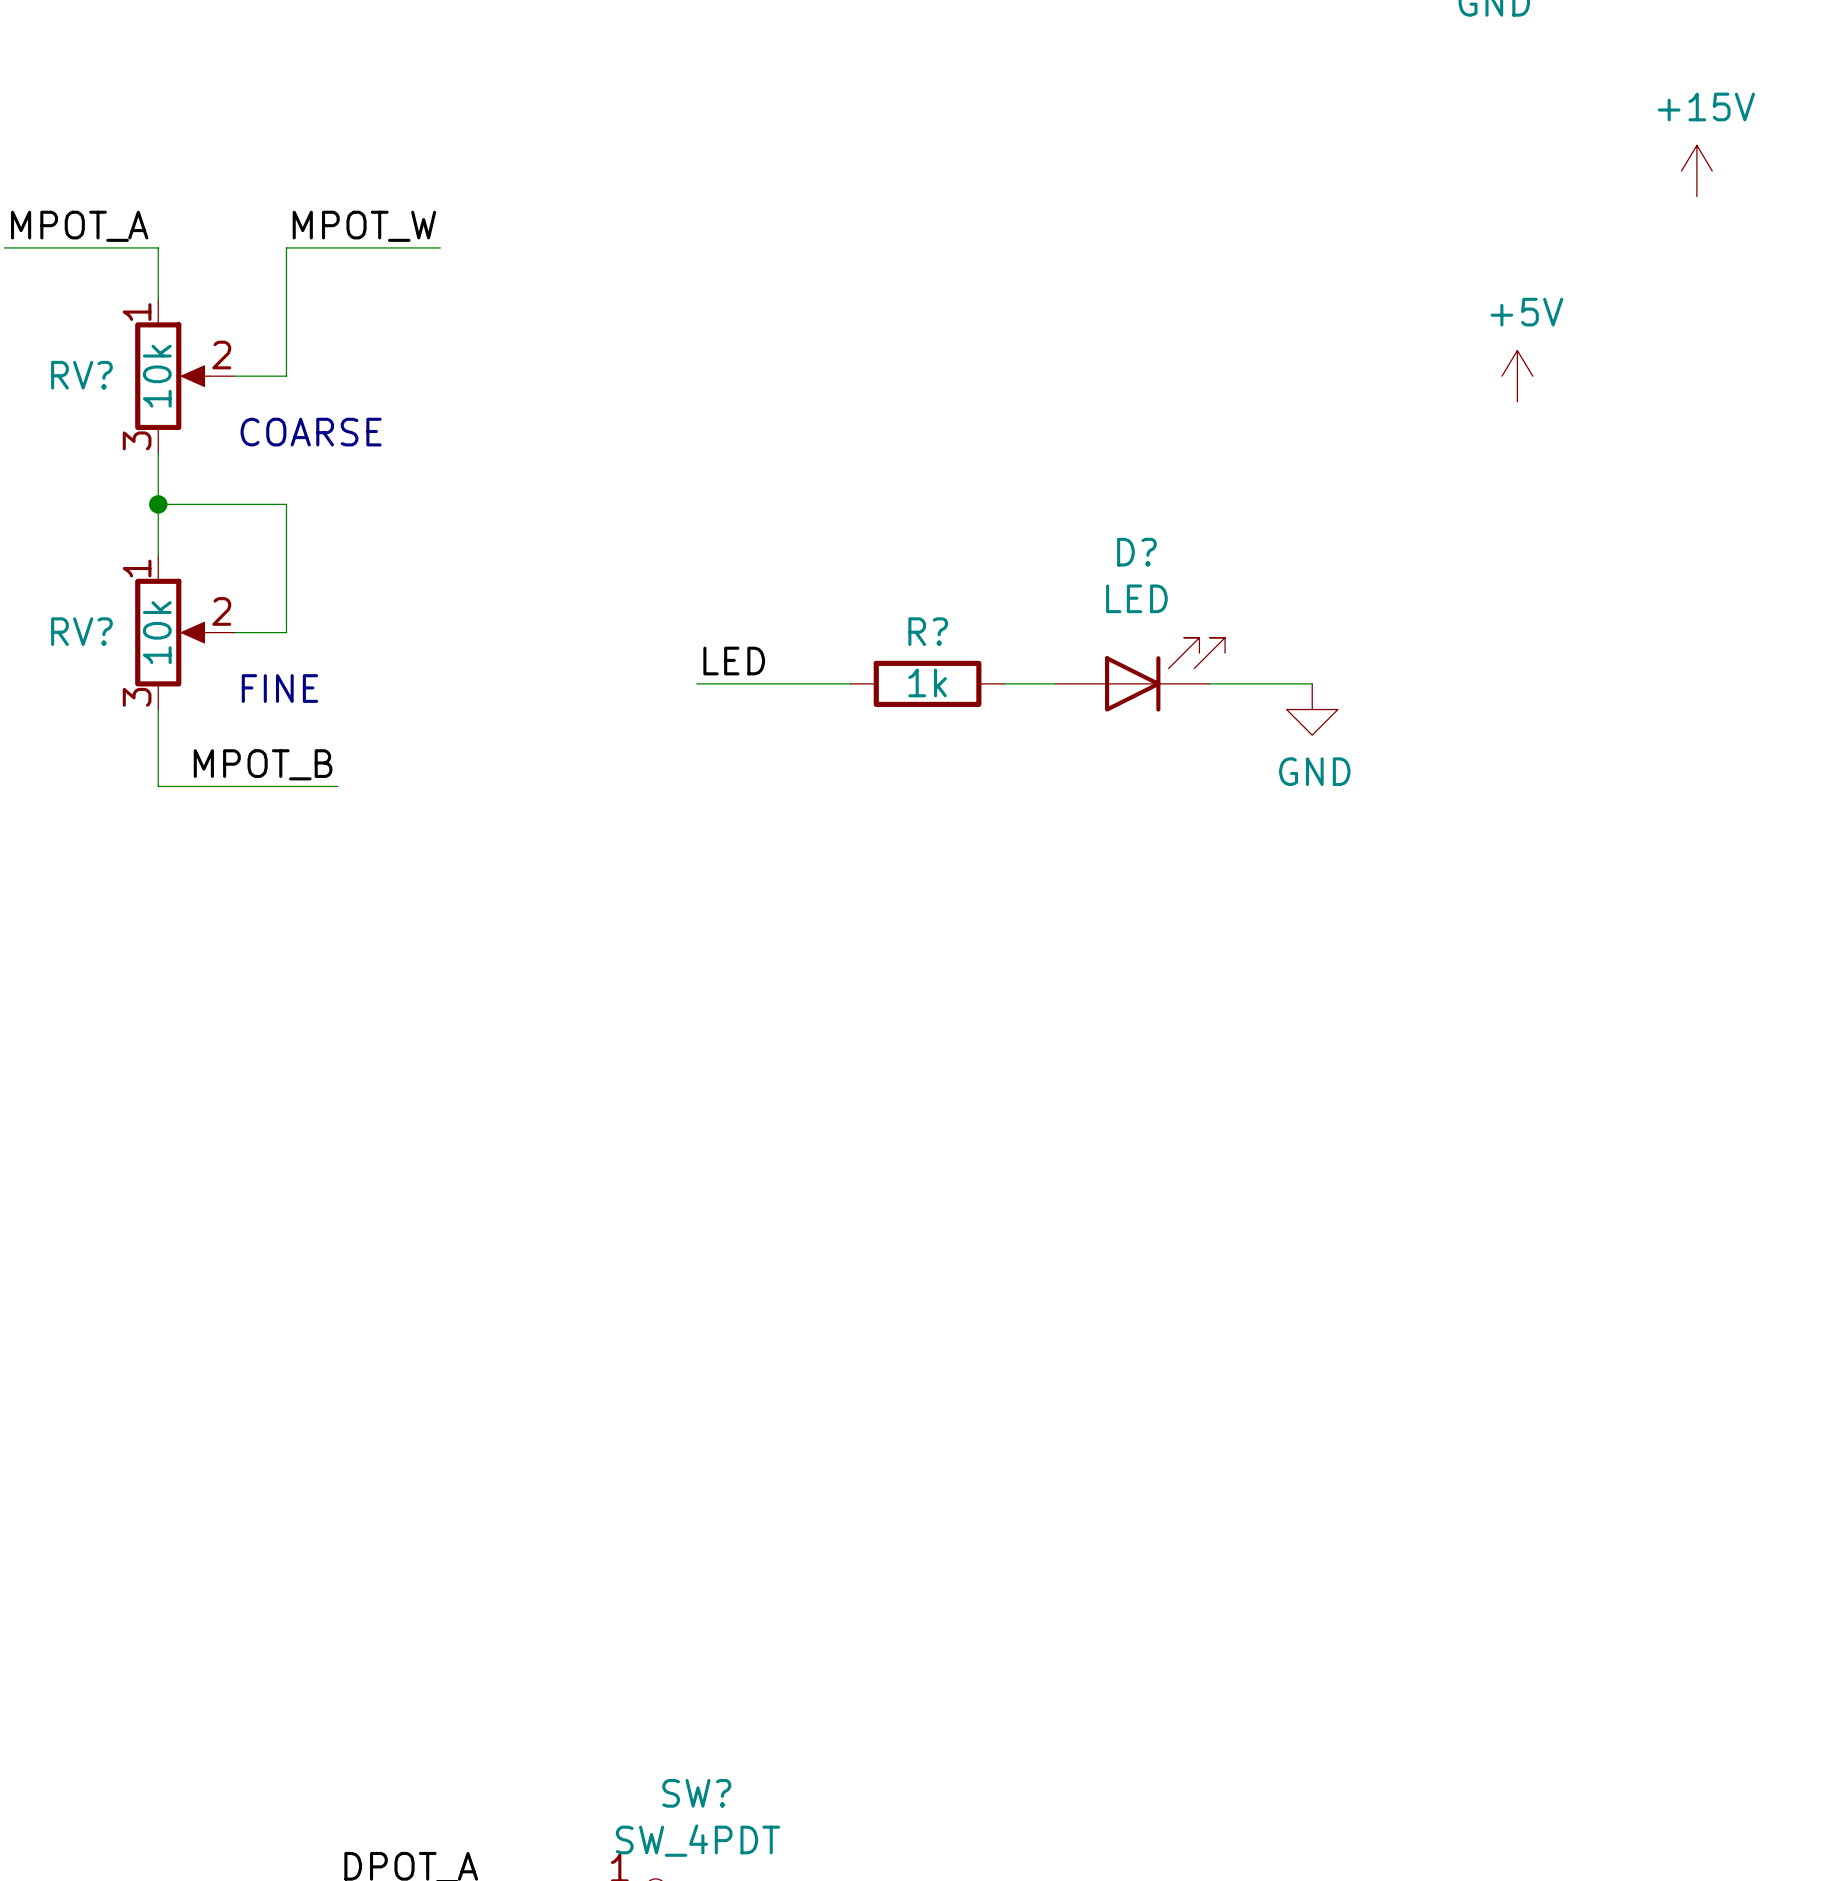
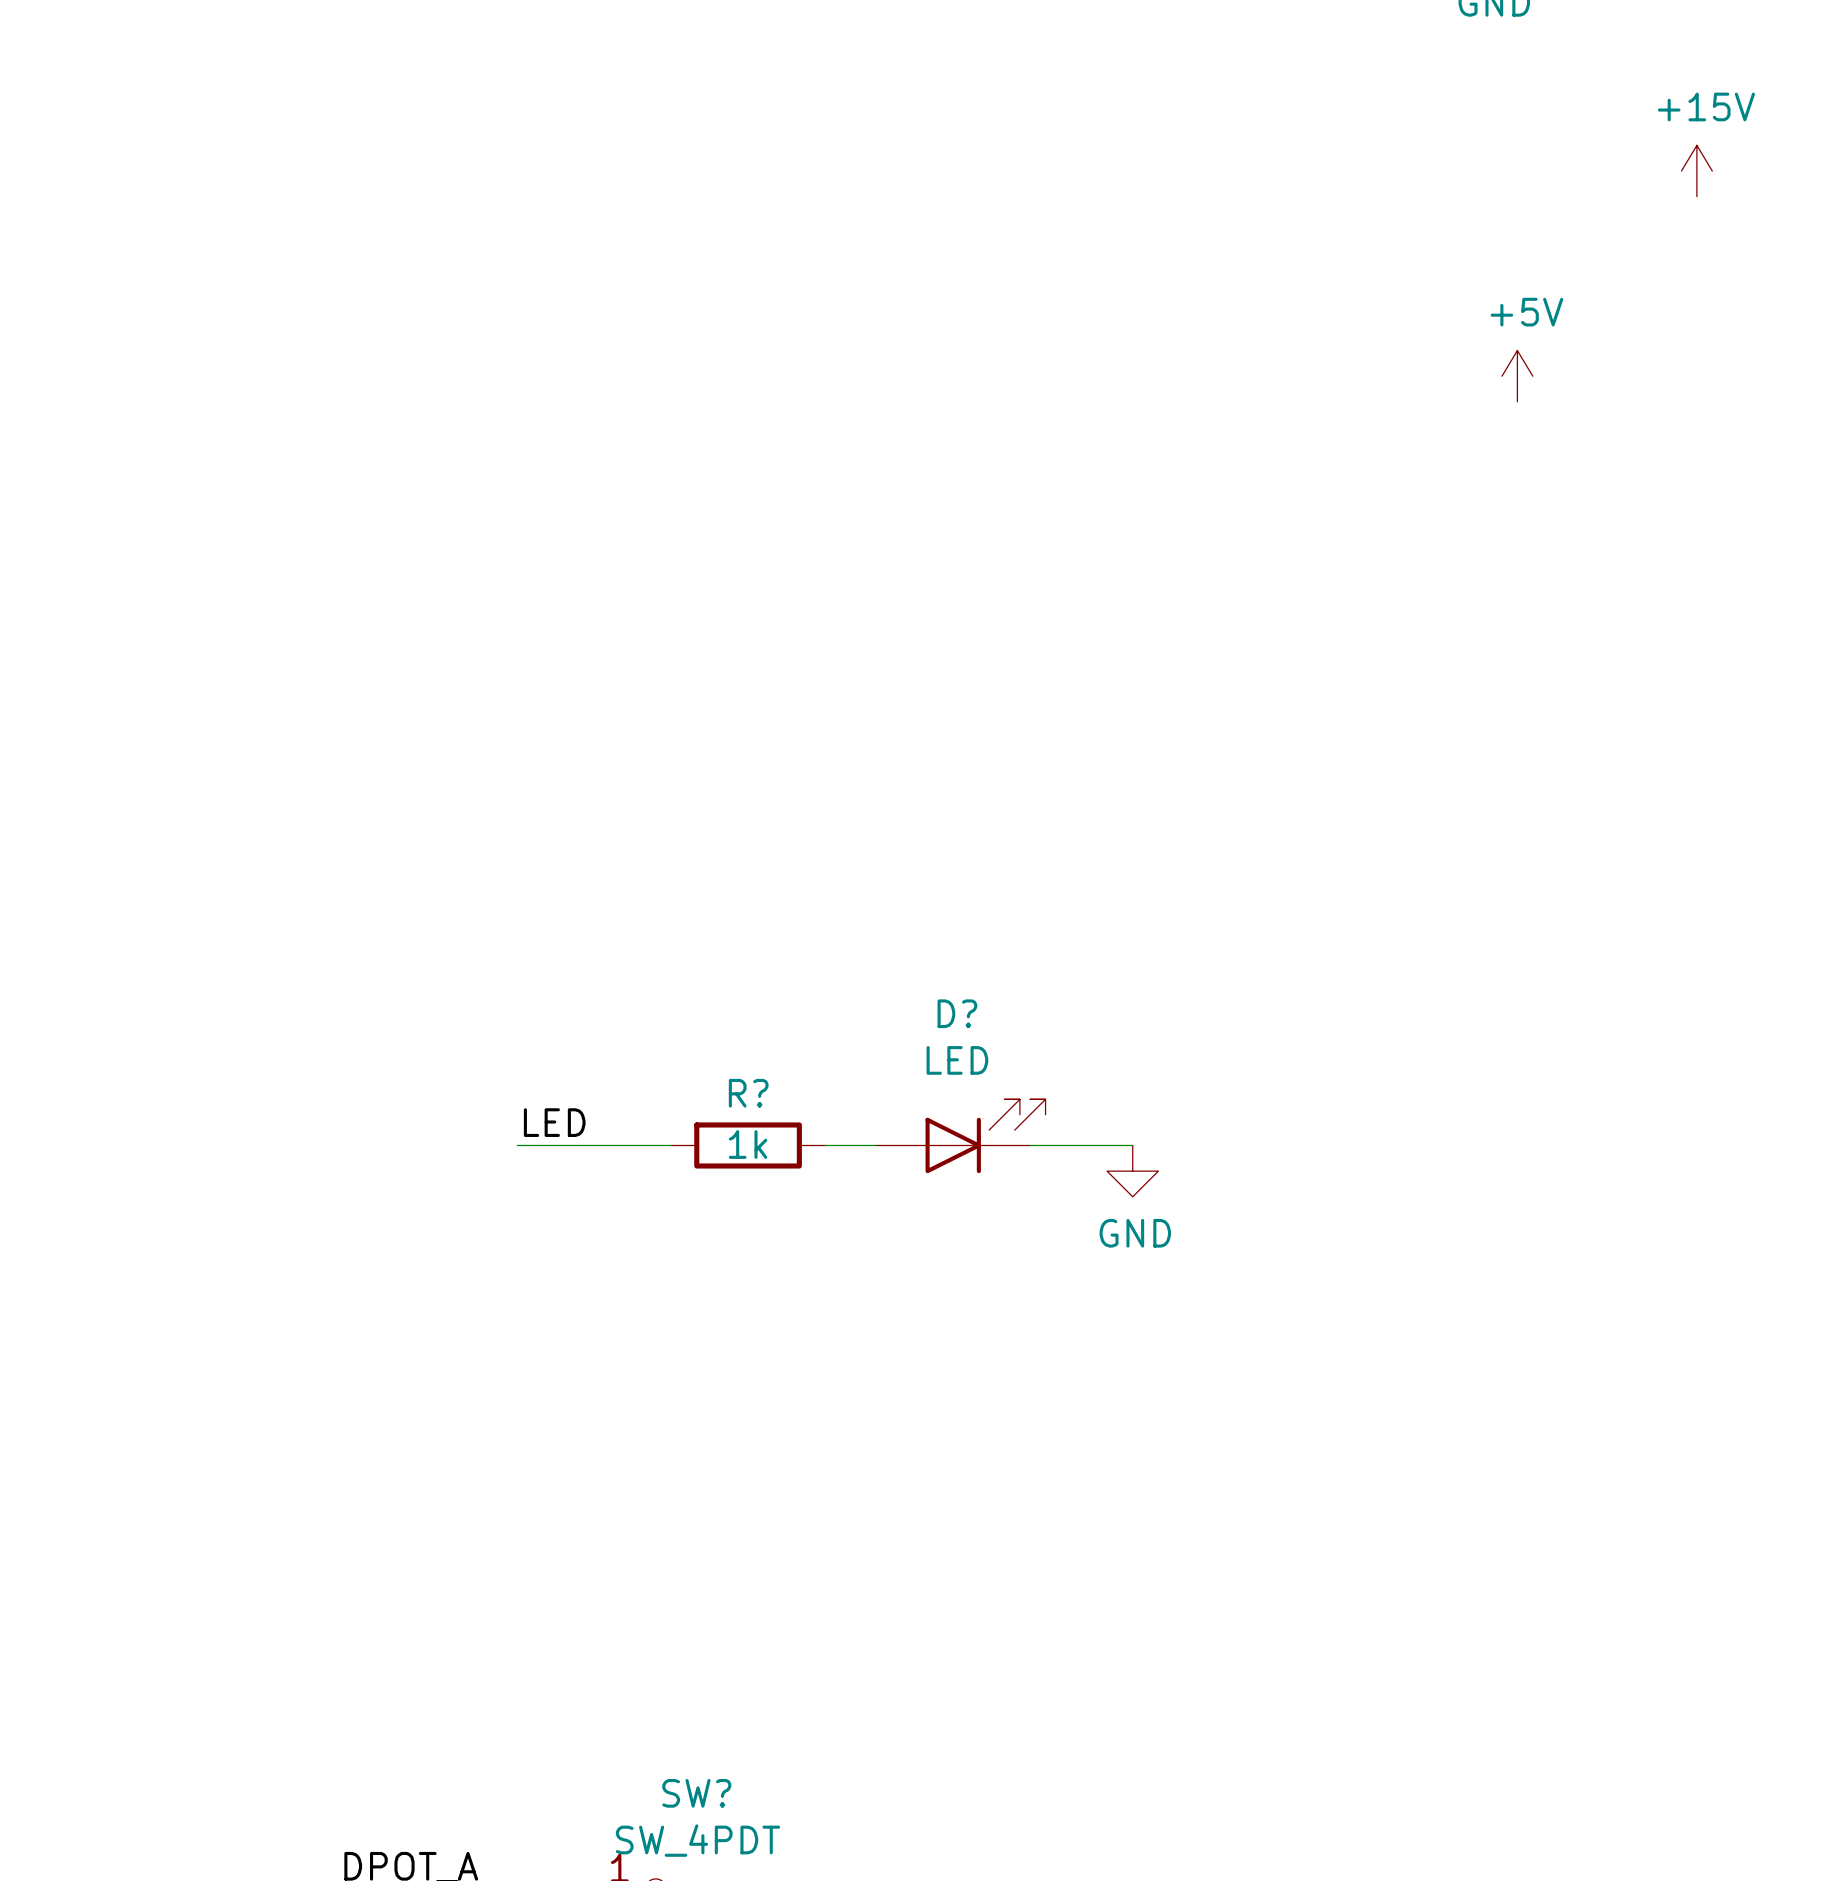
label: MPOT_A (79, 226) -> none
label: MPOT_W (364, 226) -> none
wire: (4, 247) (158, 247) (158, 299) -> none
wire: (440, 247) (286, 247) (286, 376) (235, 376) -> none
RV?: 10k (185, 376) -> none
text: COARSE (311, 432) -> none
wire: (158, 453) (158, 555) -> none
wire: (158, 504) (286, 504) (286, 632) (235, 632) -> none
junction: (158, 504) -> none
RV?: 10k (185, 632) -> none
label position: LED (734, 661) -> LED (554, 1122)
D? position: (1140, 674) -> (960, 1136)
wire: (696, 683) (850, 683) -> (517, 1145) (671, 1145)
R? position: (927, 683) -> (748, 1145)
wire: (1004, 683) (1055, 683) -> (825, 1145) (876, 1145)
wire: (1209, 683) (1312, 683) -> (1030, 1145) (1132, 1145)
text: FINE (279, 688) -> none
wire: (158, 709) (158, 786) (337, 786) -> none
power symbol position: GND (1312, 709) -> GND (1132, 1171)
label: MPOT_B (263, 764) -> none

